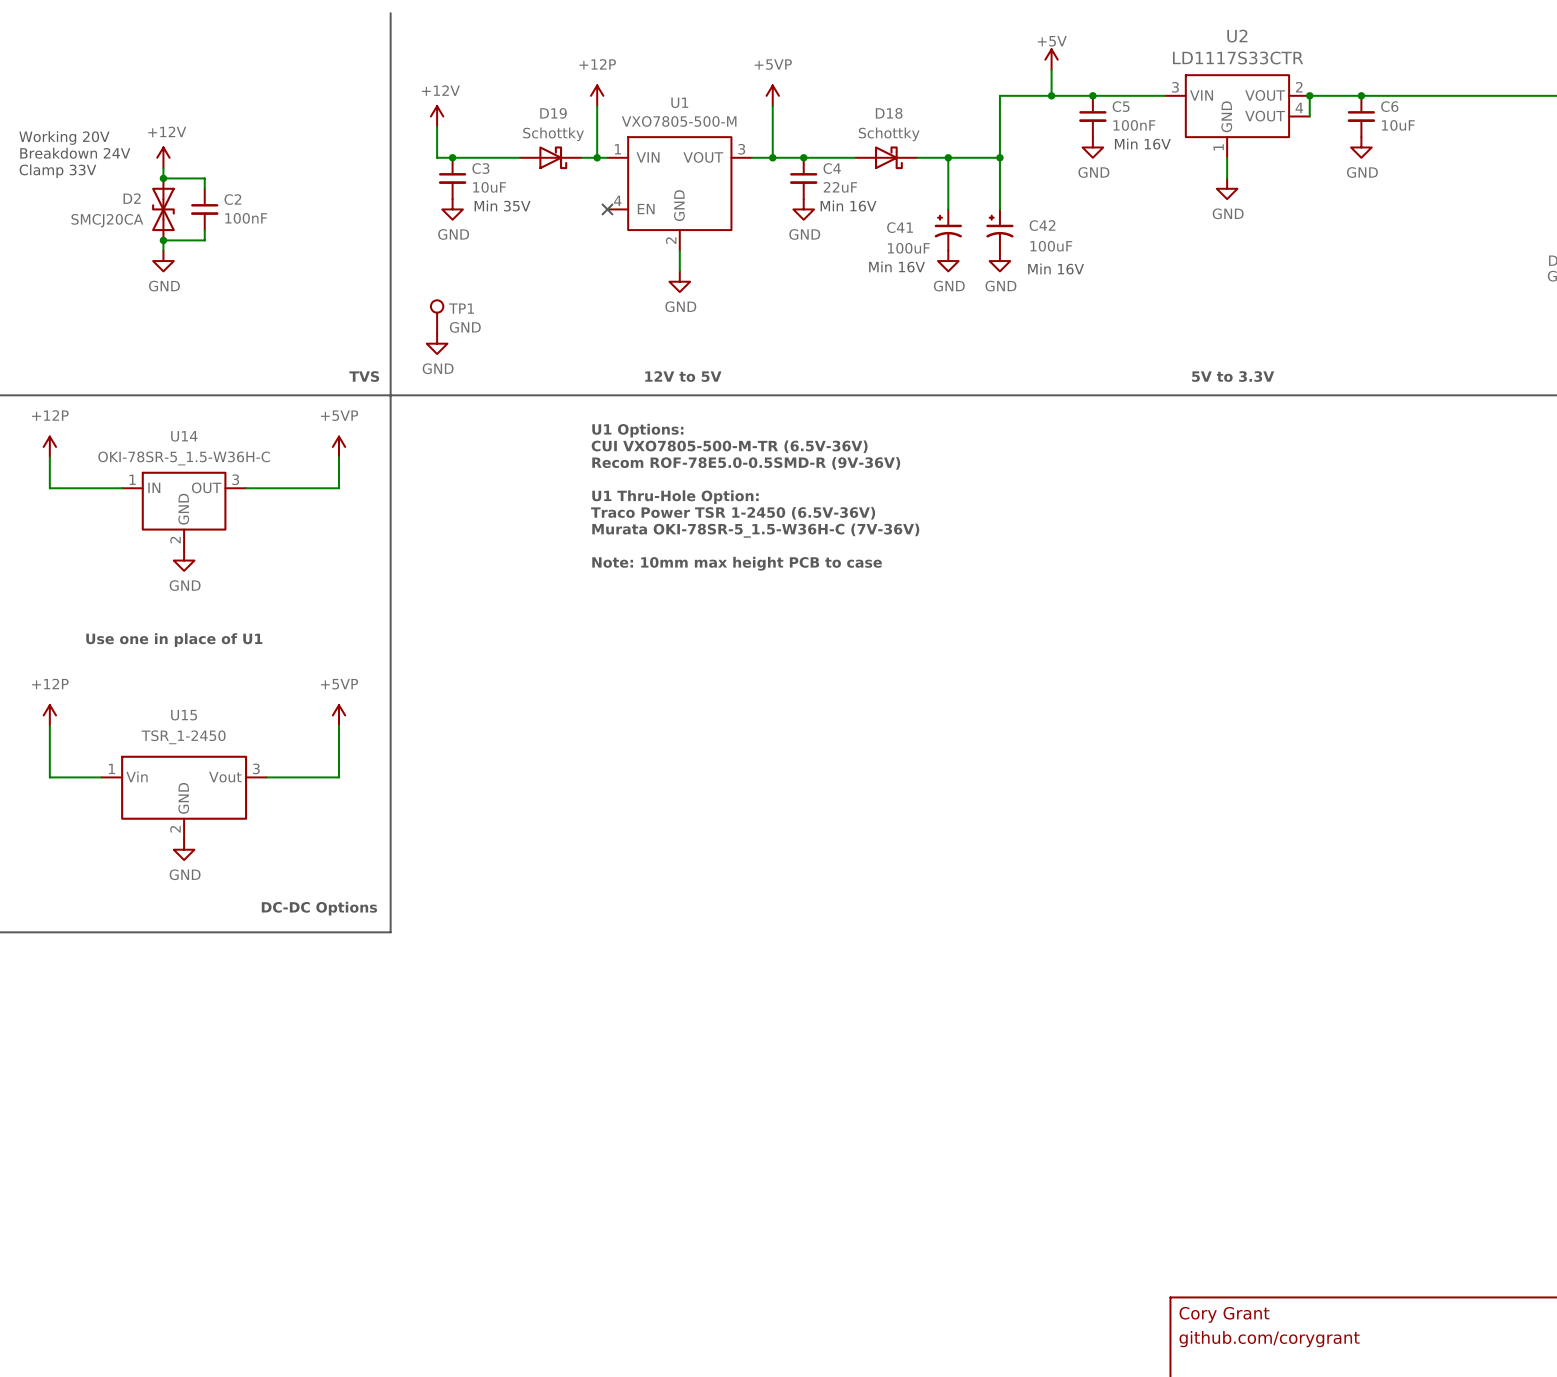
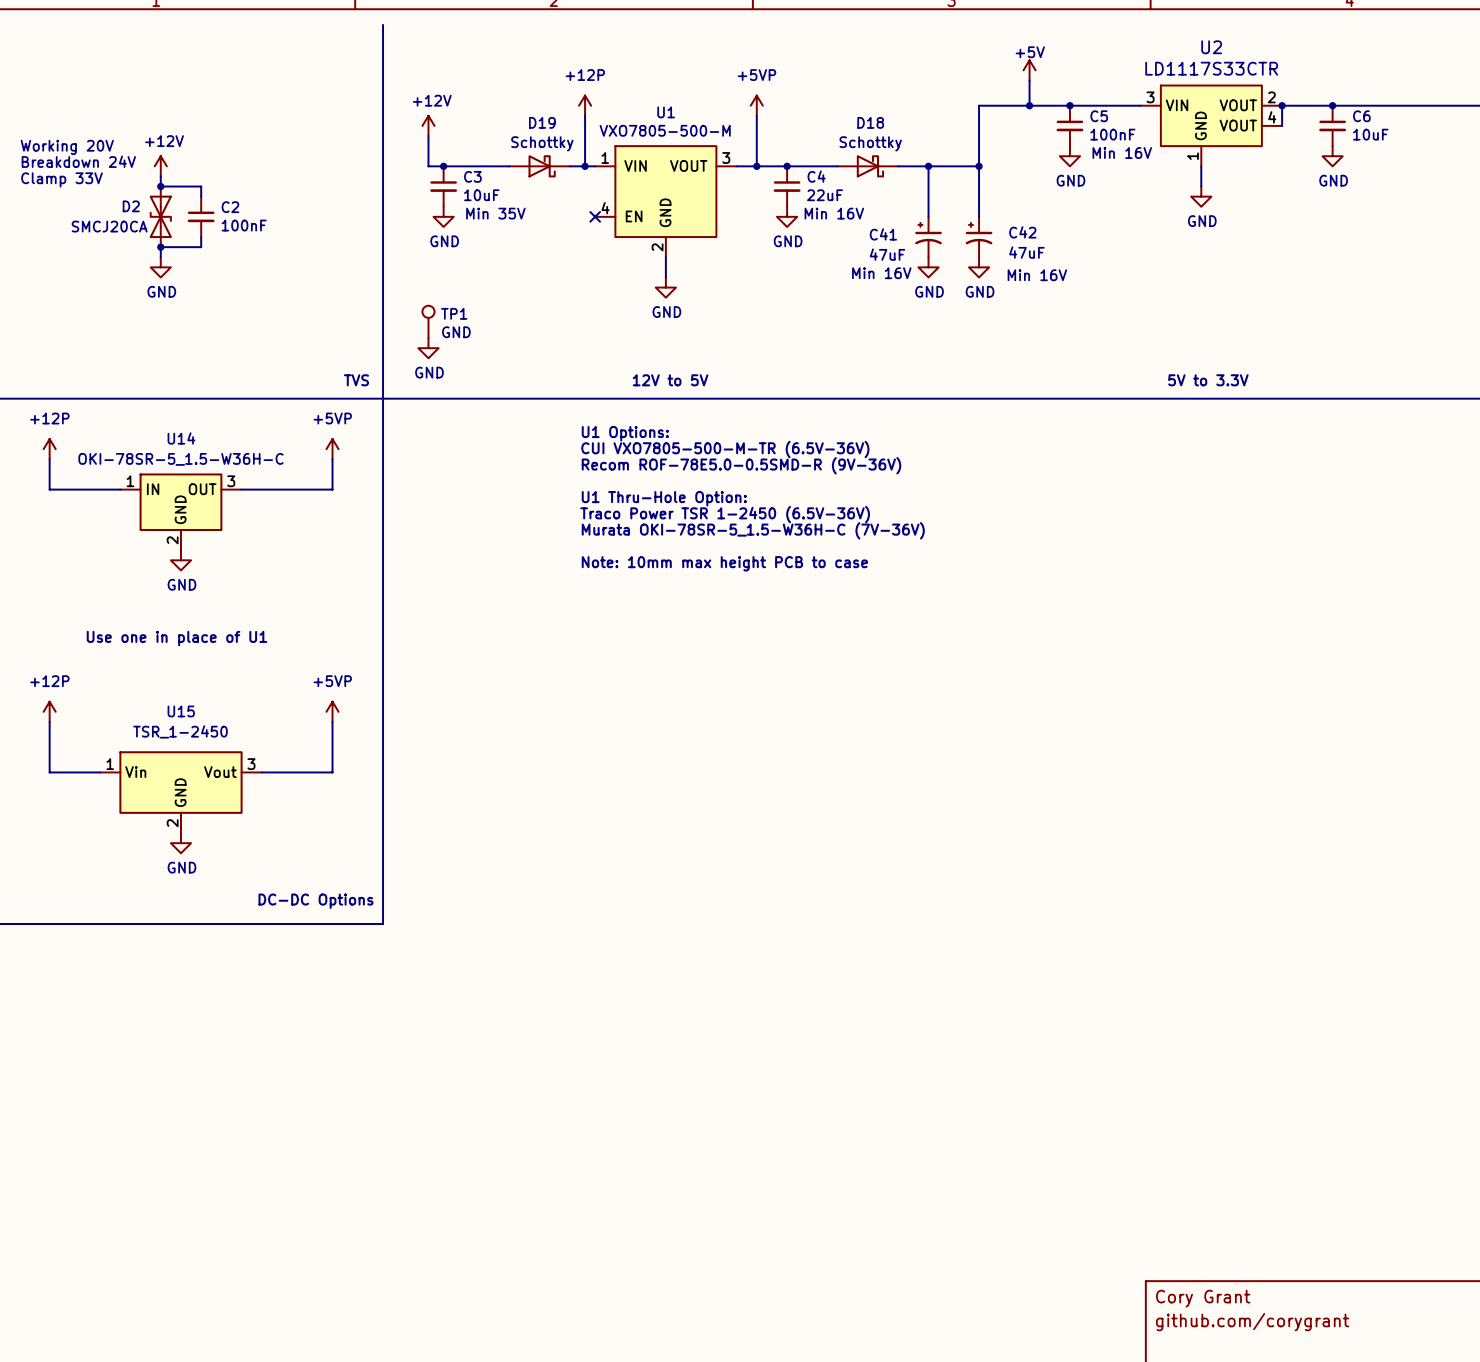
C42 value: 100uF (1051, 246) -> 47uF (1026, 252)
C41 value: 100uF (908, 248) -> 47uF (887, 254)

